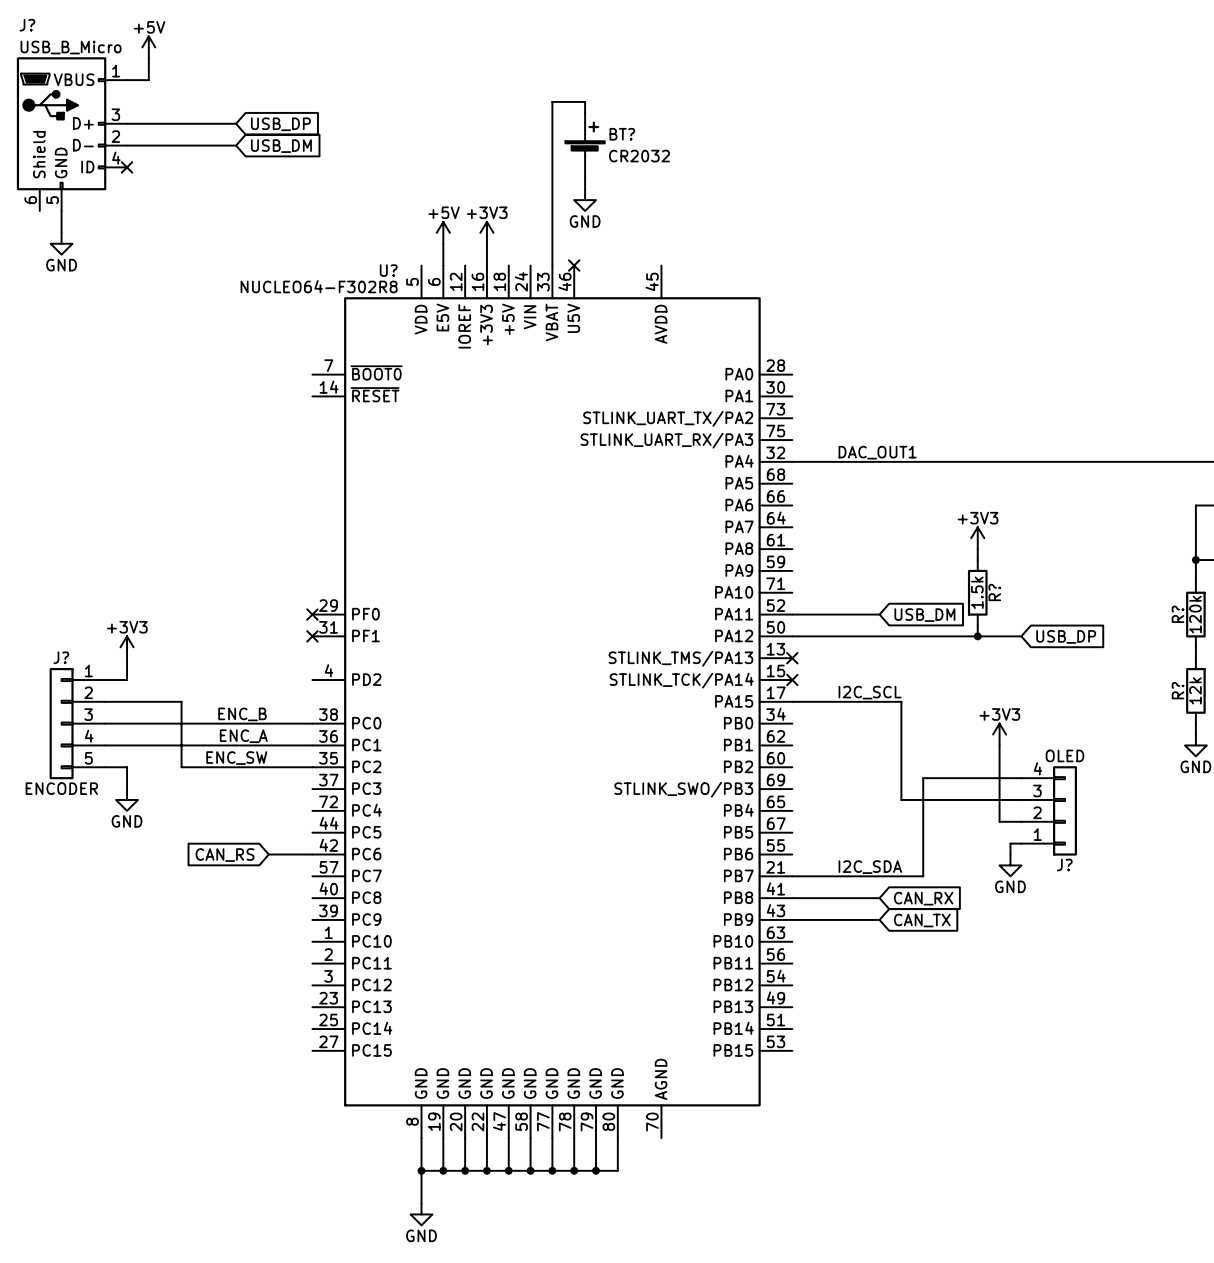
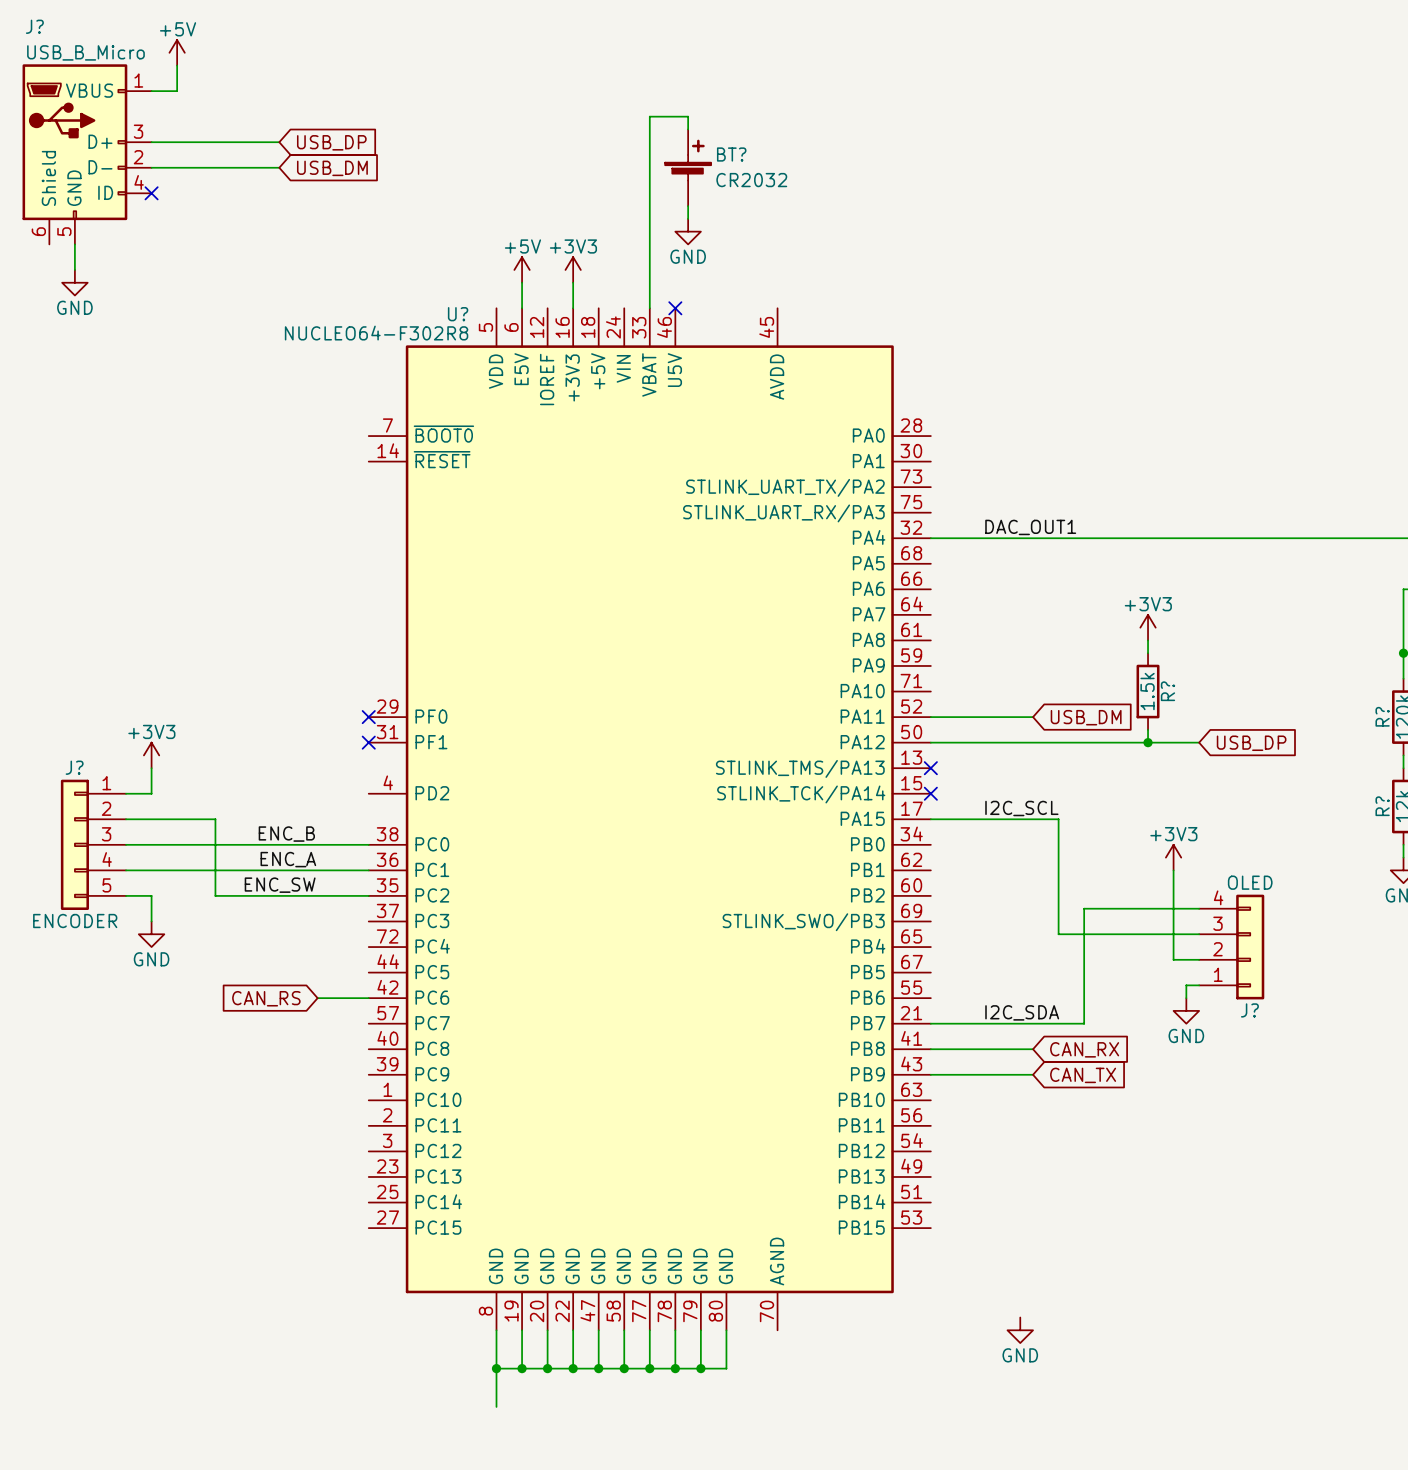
power symbol: none -> GND (1020, 1330)
power symbol: GND (421, 1214) -> none

